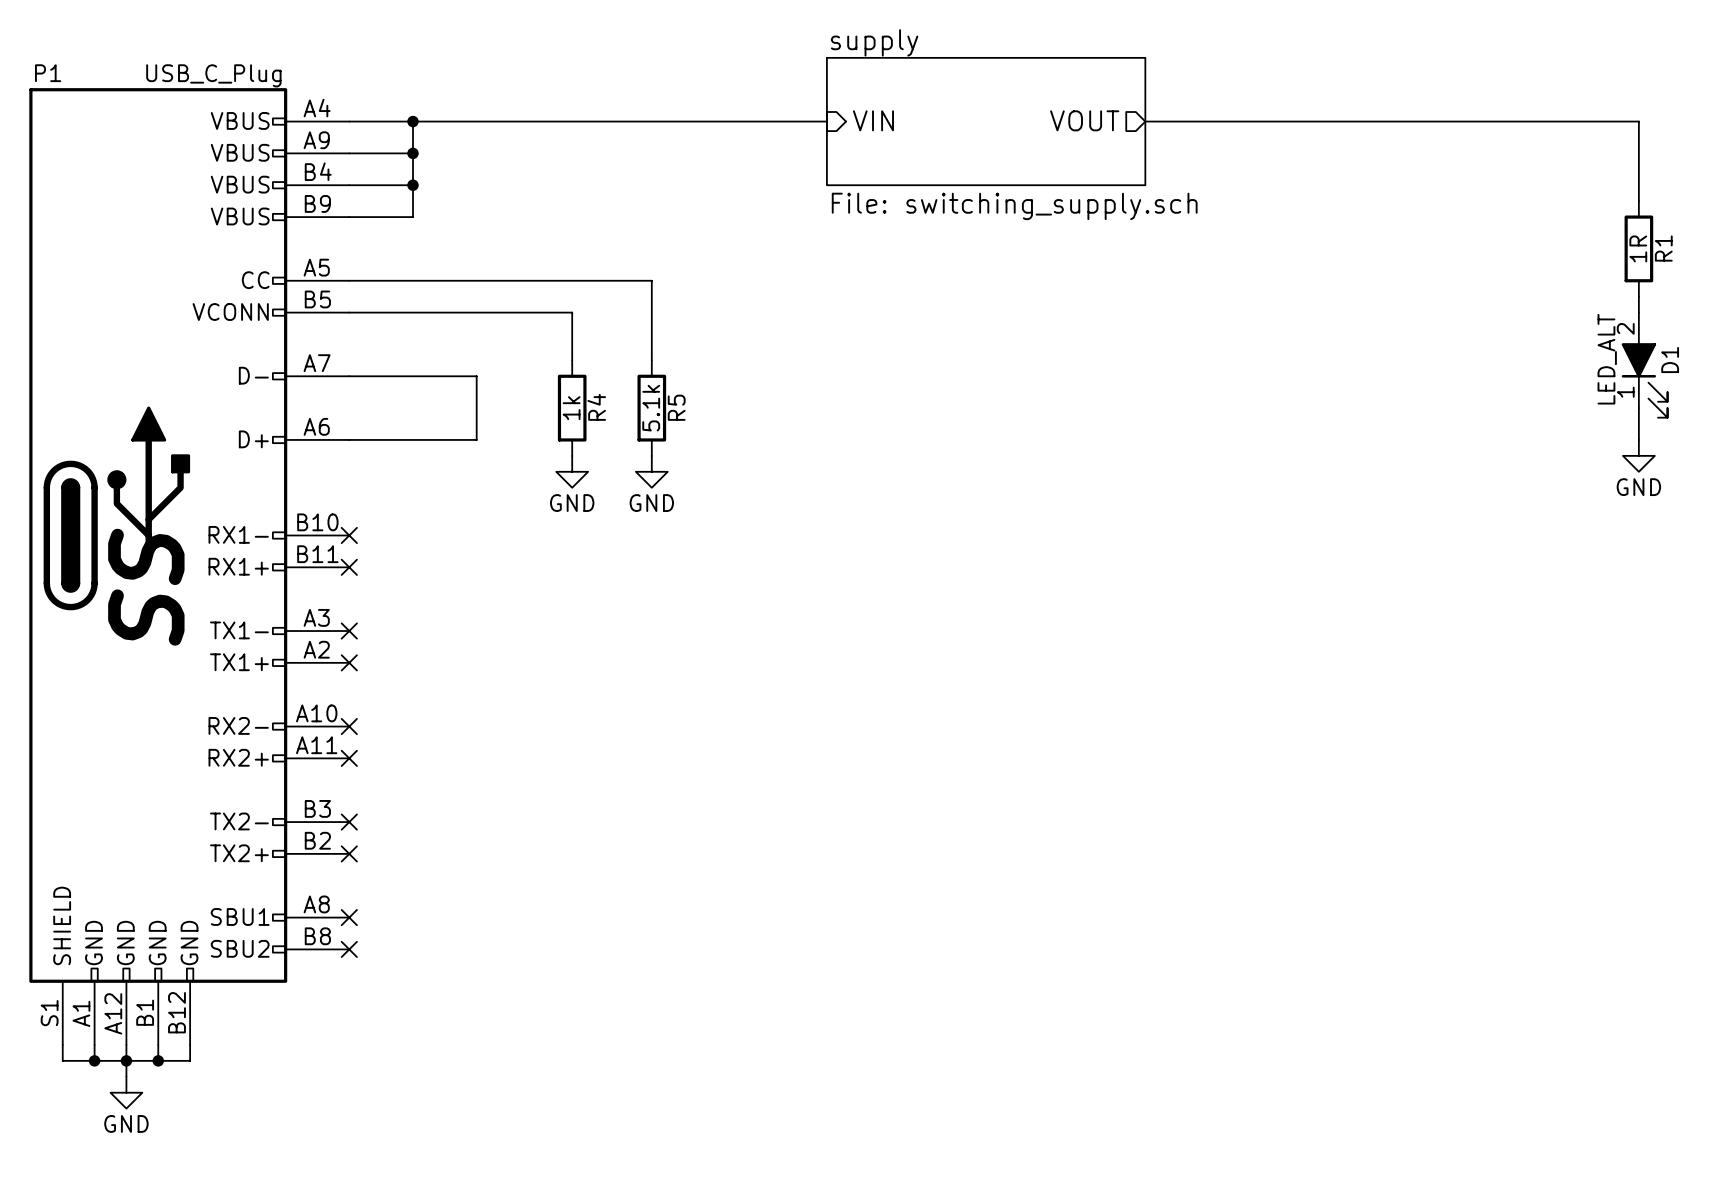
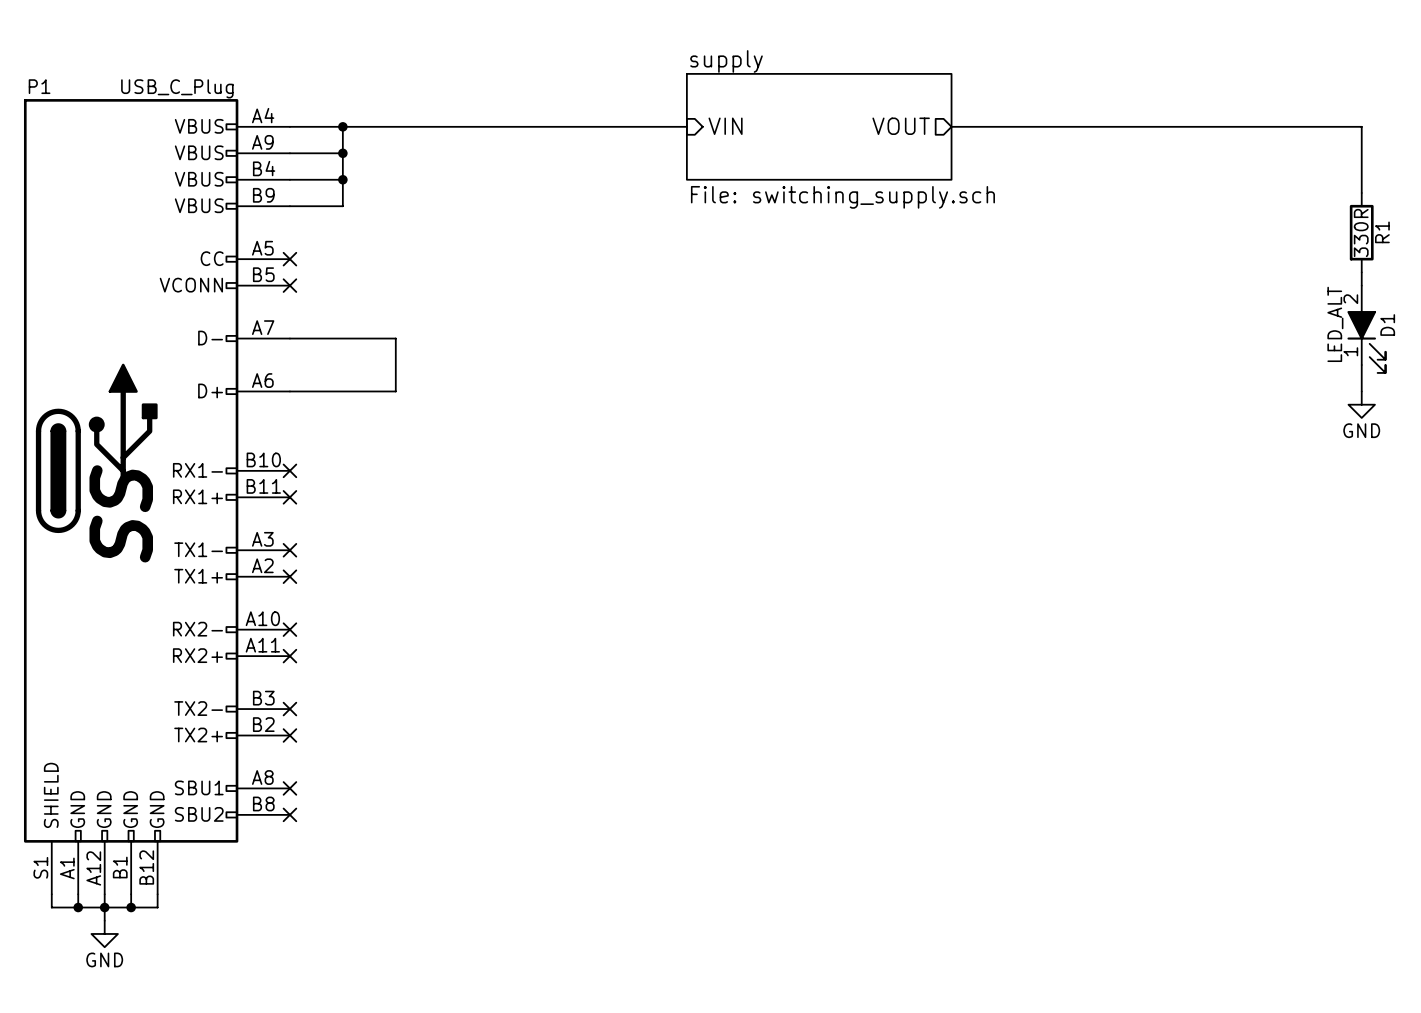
R1 value: 1R (1638, 248) -> 330R (1361, 233)
wire: (349, 280) (651, 280) (651, 360) -> none
no-connect mark: none -> (289, 259)
wire: (349, 312) (572, 312) (572, 360) -> none
no-connect mark: none -> (289, 285)
R4: 1k (572, 408) -> none
R5: 5.1k (651, 408) -> none
power symbol: GND (572, 471) -> none
power symbol: GND (651, 471) -> none

